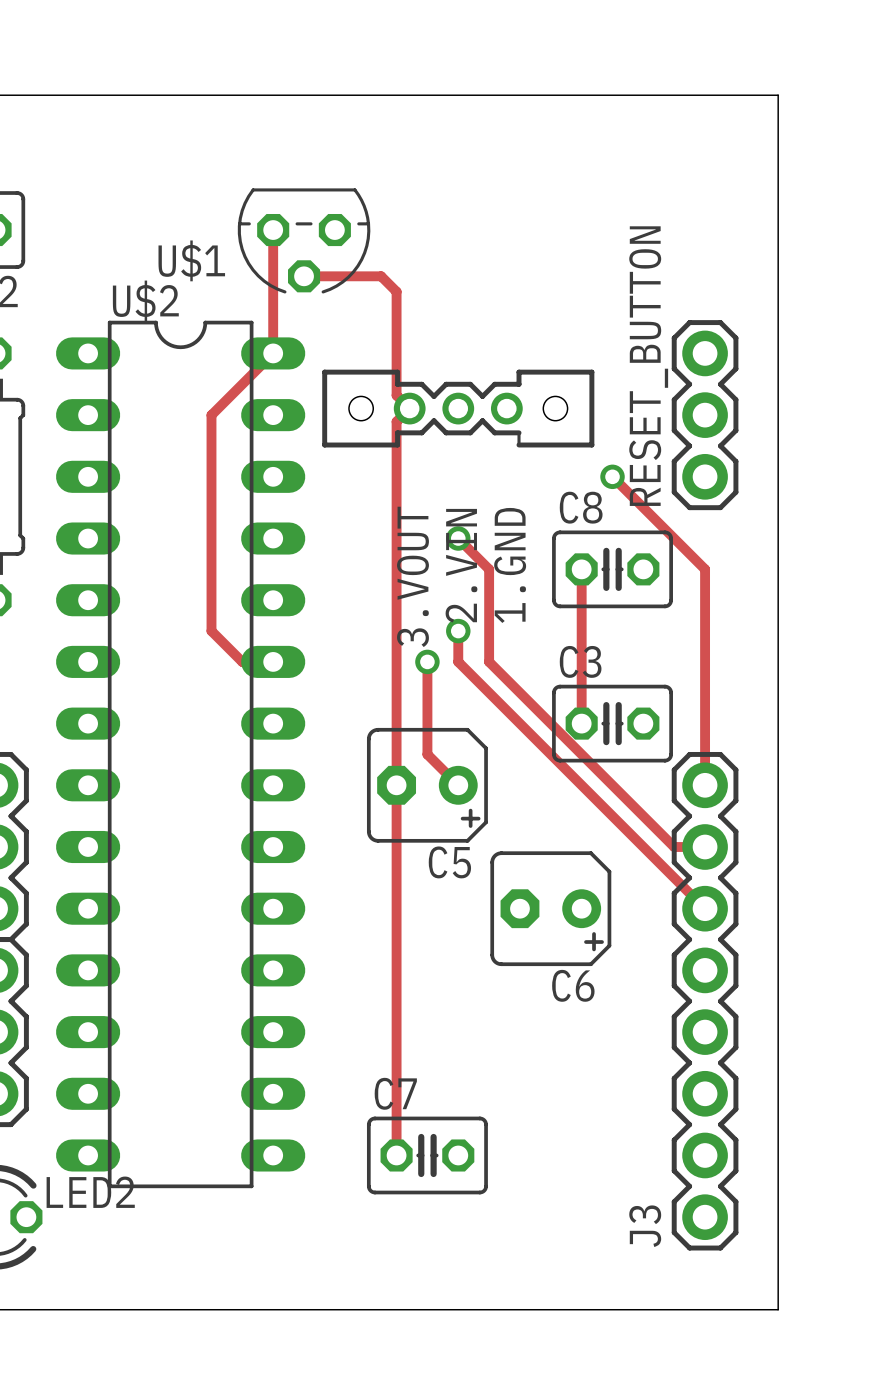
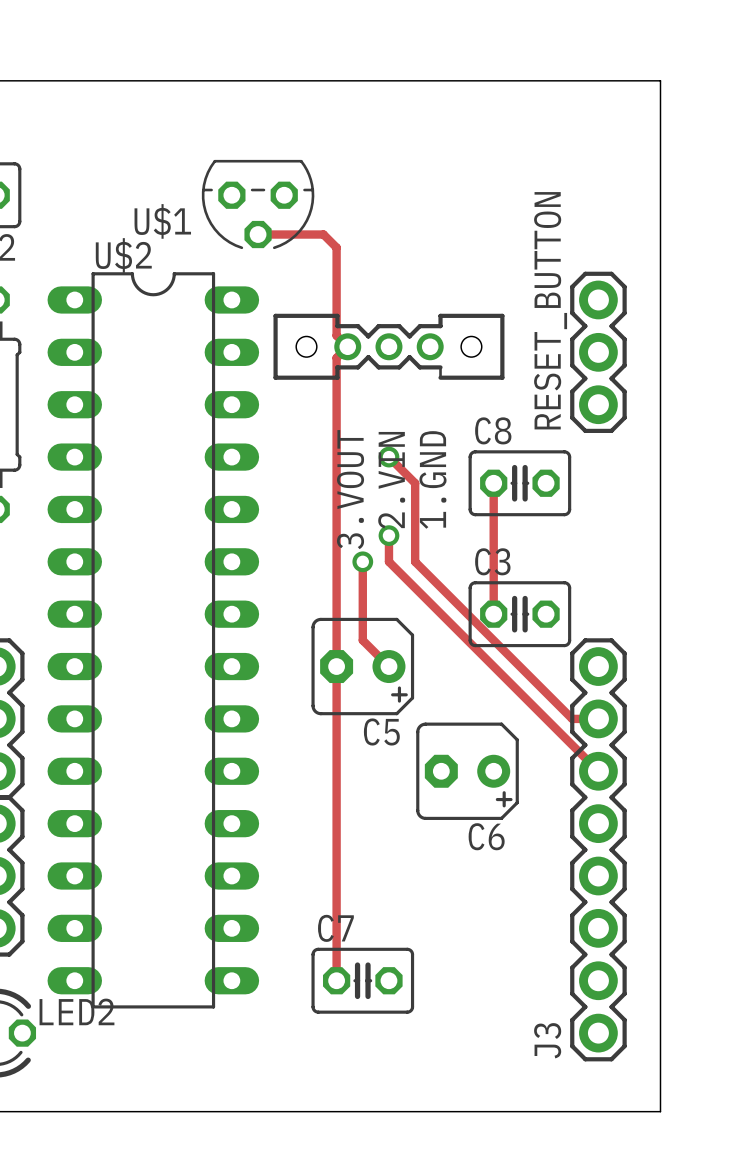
track: (273, 230) (273, 353) (211, 415) (211, 631) (242, 661) (273, 661) -> none
track: (612, 476) (705, 569) (705, 785) -> none
via: (612, 476) -> none

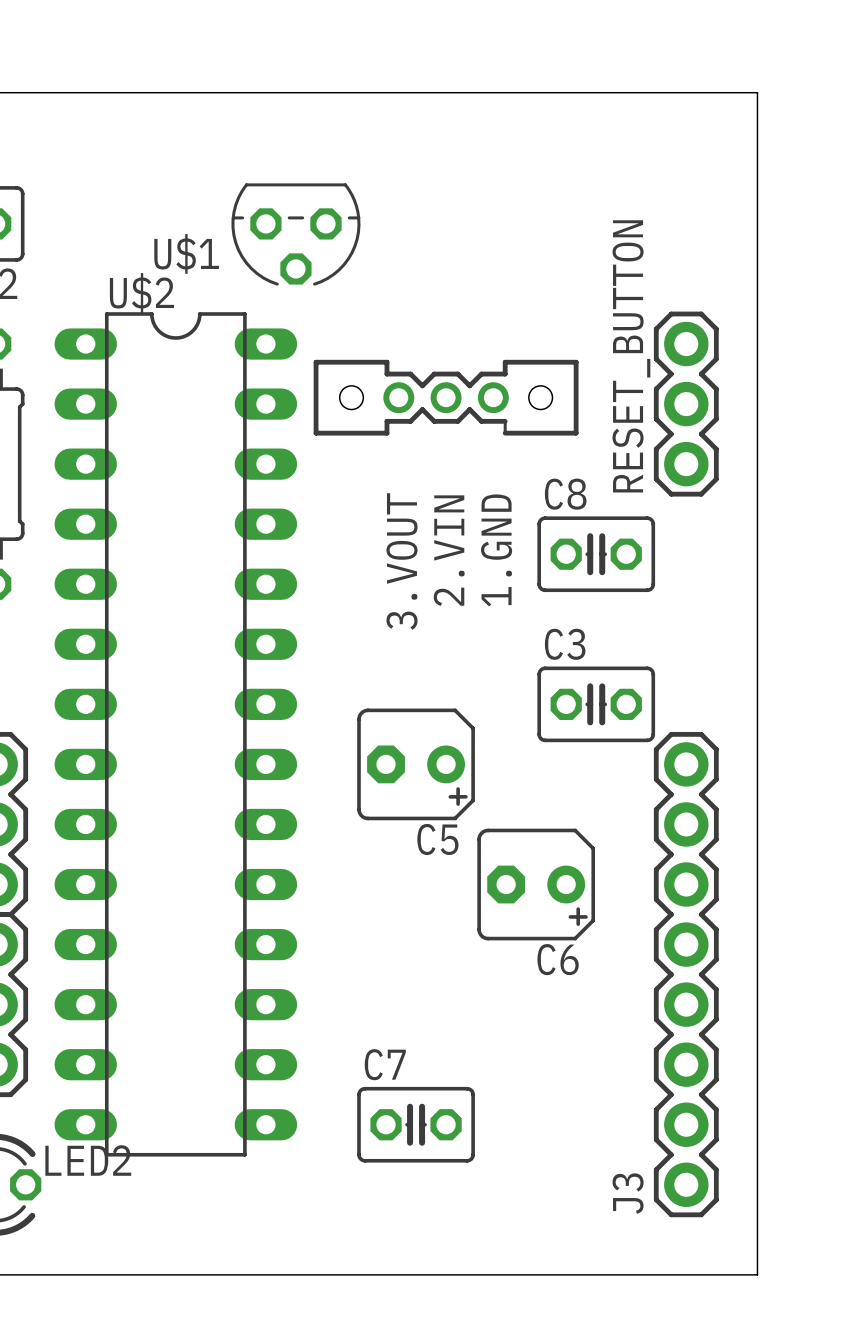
track: (258, 234) (323, 234) (336, 247) (336, 335) (347, 346) (336, 357) (336, 980) -> none
track: (388, 457) (415, 483) (415, 561) (572, 718) (598, 718) -> none
via: (388, 457) -> none
track: (493, 483) (493, 614) -> none
track: (388, 535) (388, 561) (598, 771) -> none
via: (388, 535) -> none
track: (362, 561) (362, 640) (388, 666) -> none
via: (362, 561) -> none

